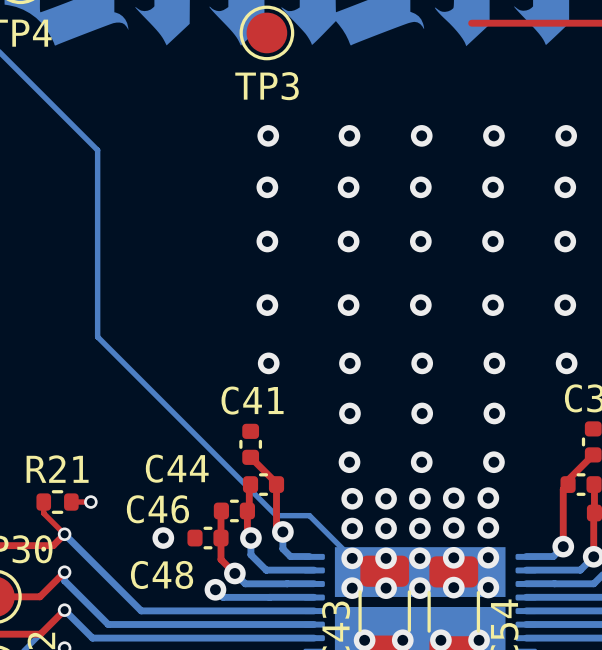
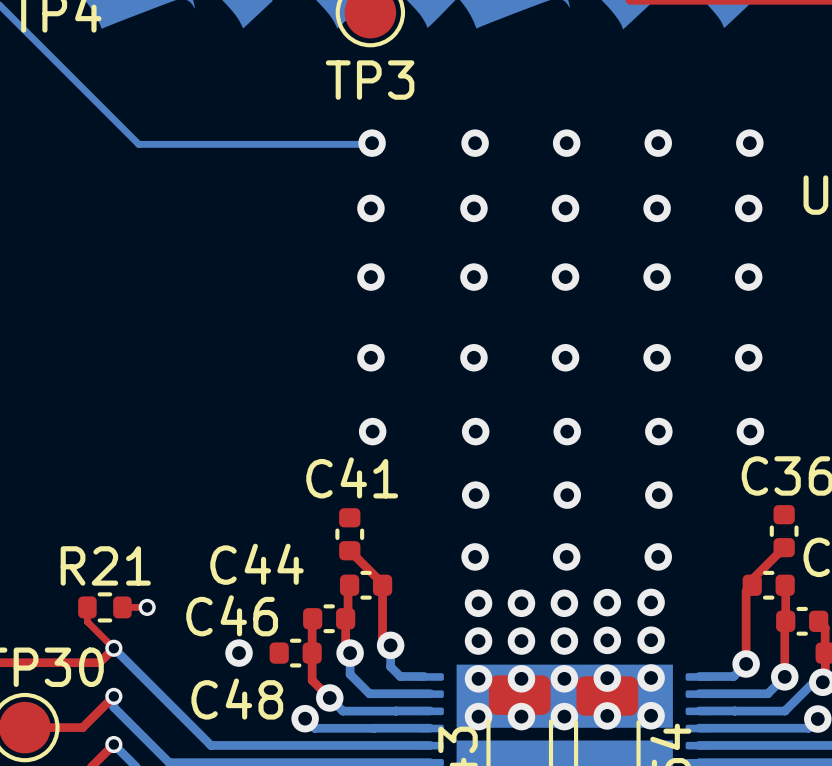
bottom track: (84, 136) (97, 150) (97, 336) (276, 515) (309, 515) (352, 558) -> (138, 144) (372, 143)

